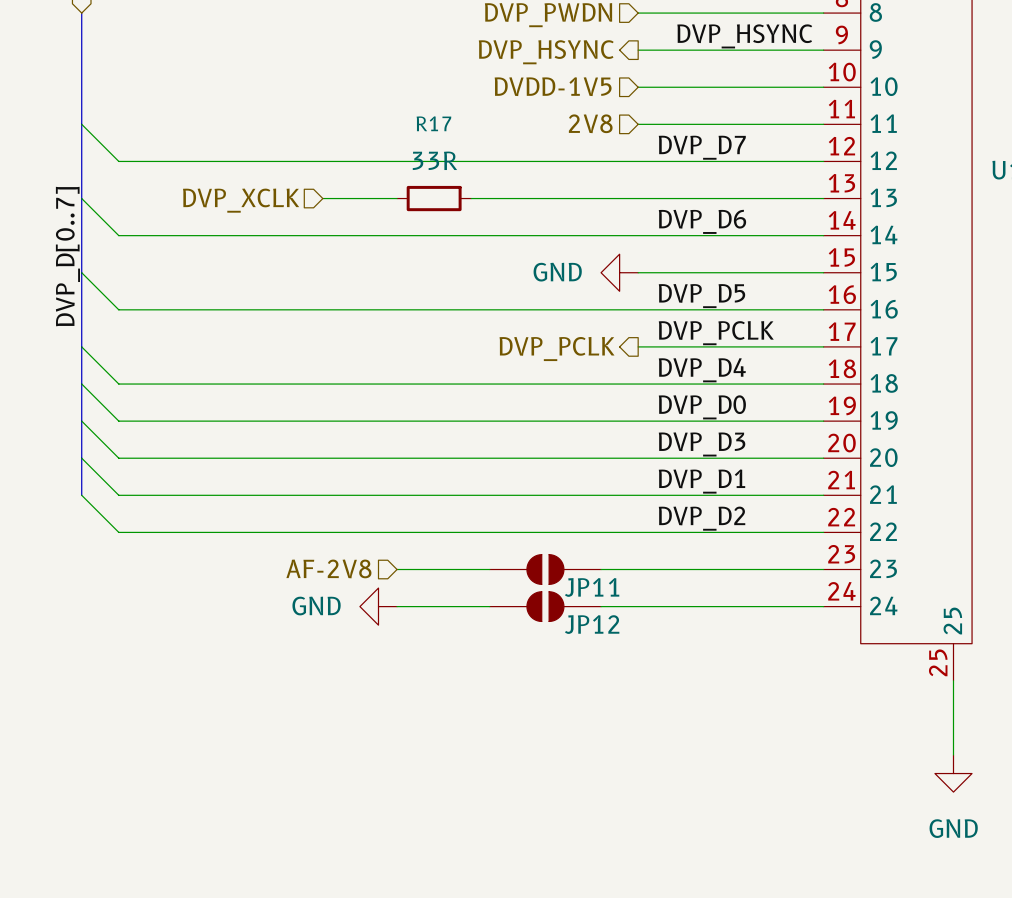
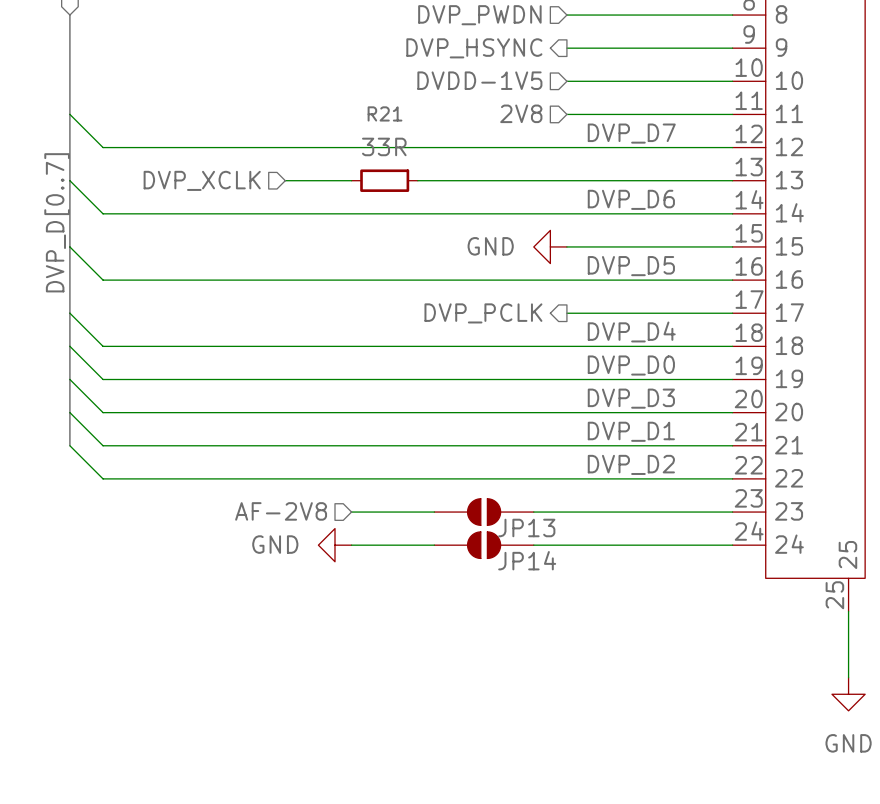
label: DVP_HSYNC (744, 36) -> none
R17 name: R17 (433, 123) -> R21 (385, 113)
label: DVP_PCLK (716, 333) -> none
JP11 name: JP11 (592, 587) -> JP13 (526, 527)
JP12 name: JP12 (592, 624) -> JP14 (527, 560)

